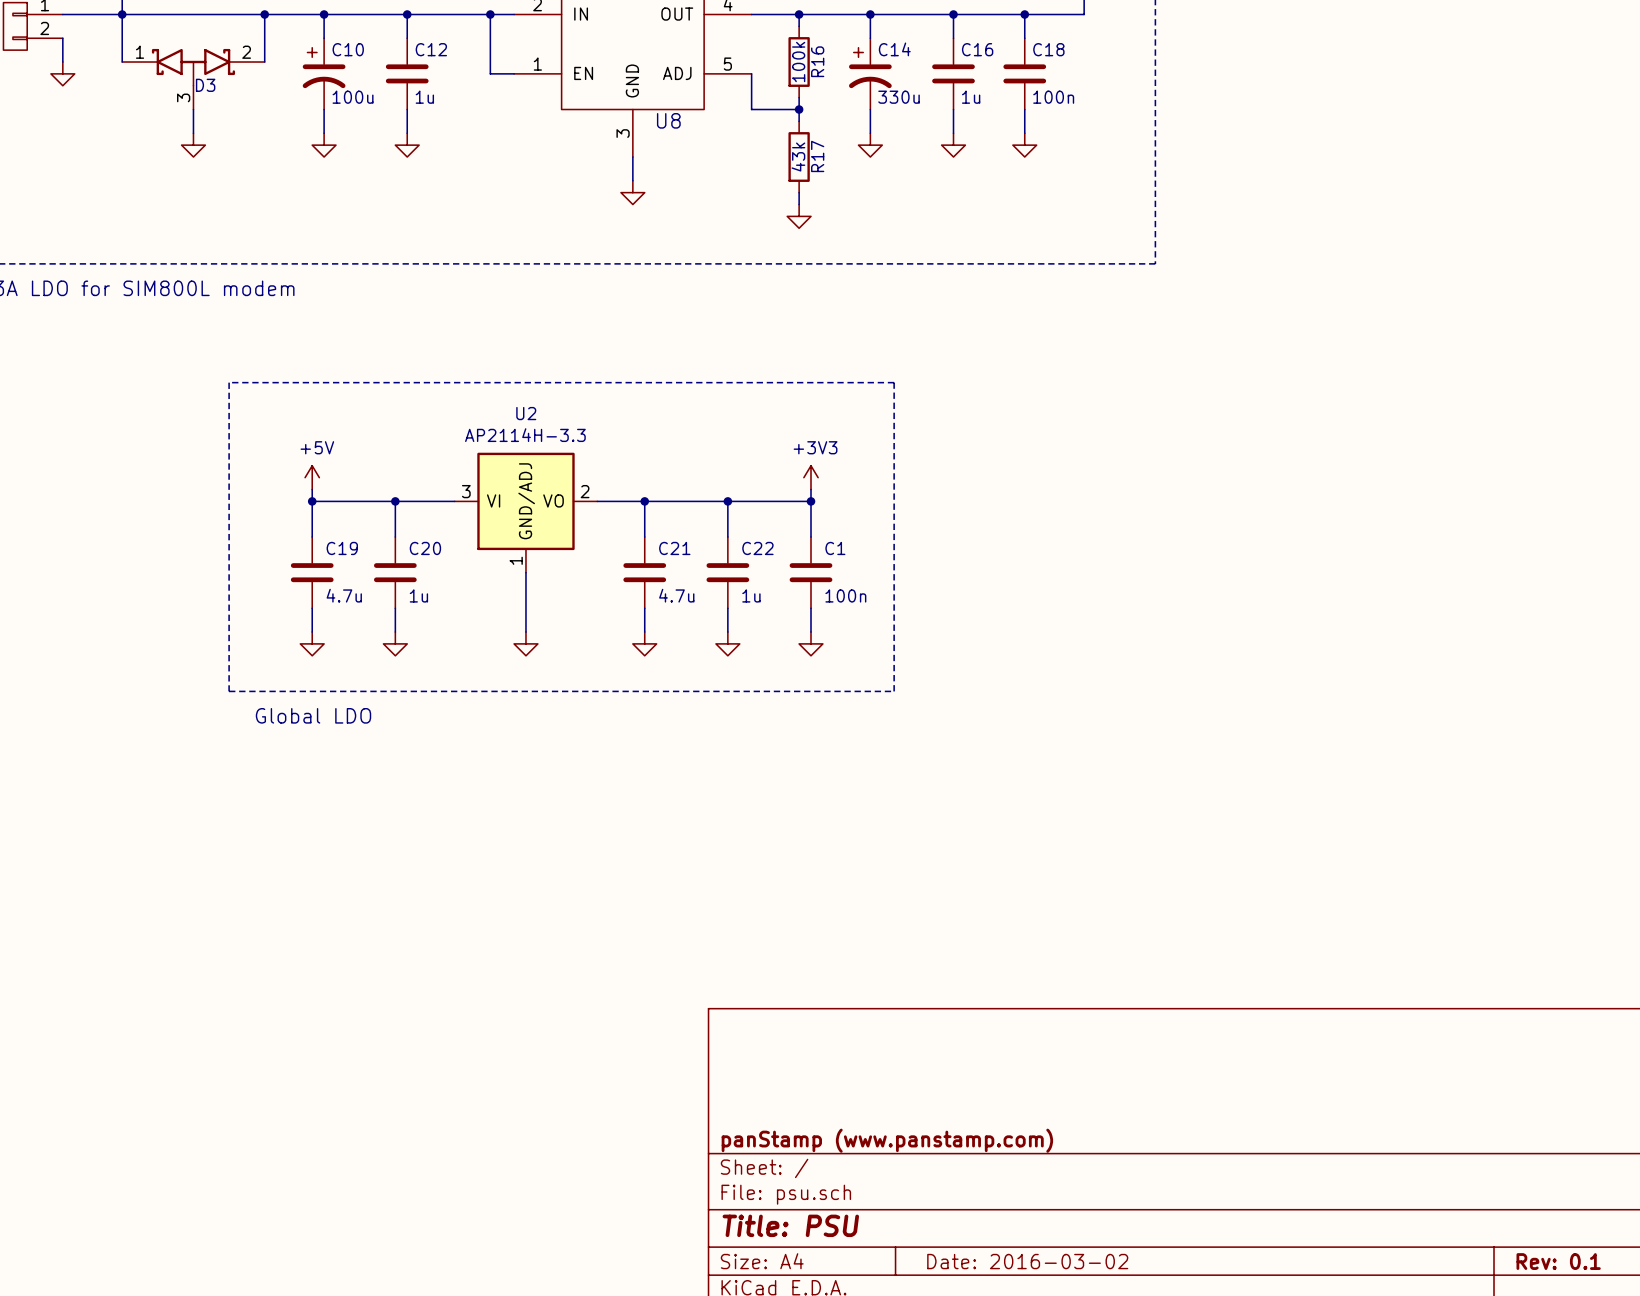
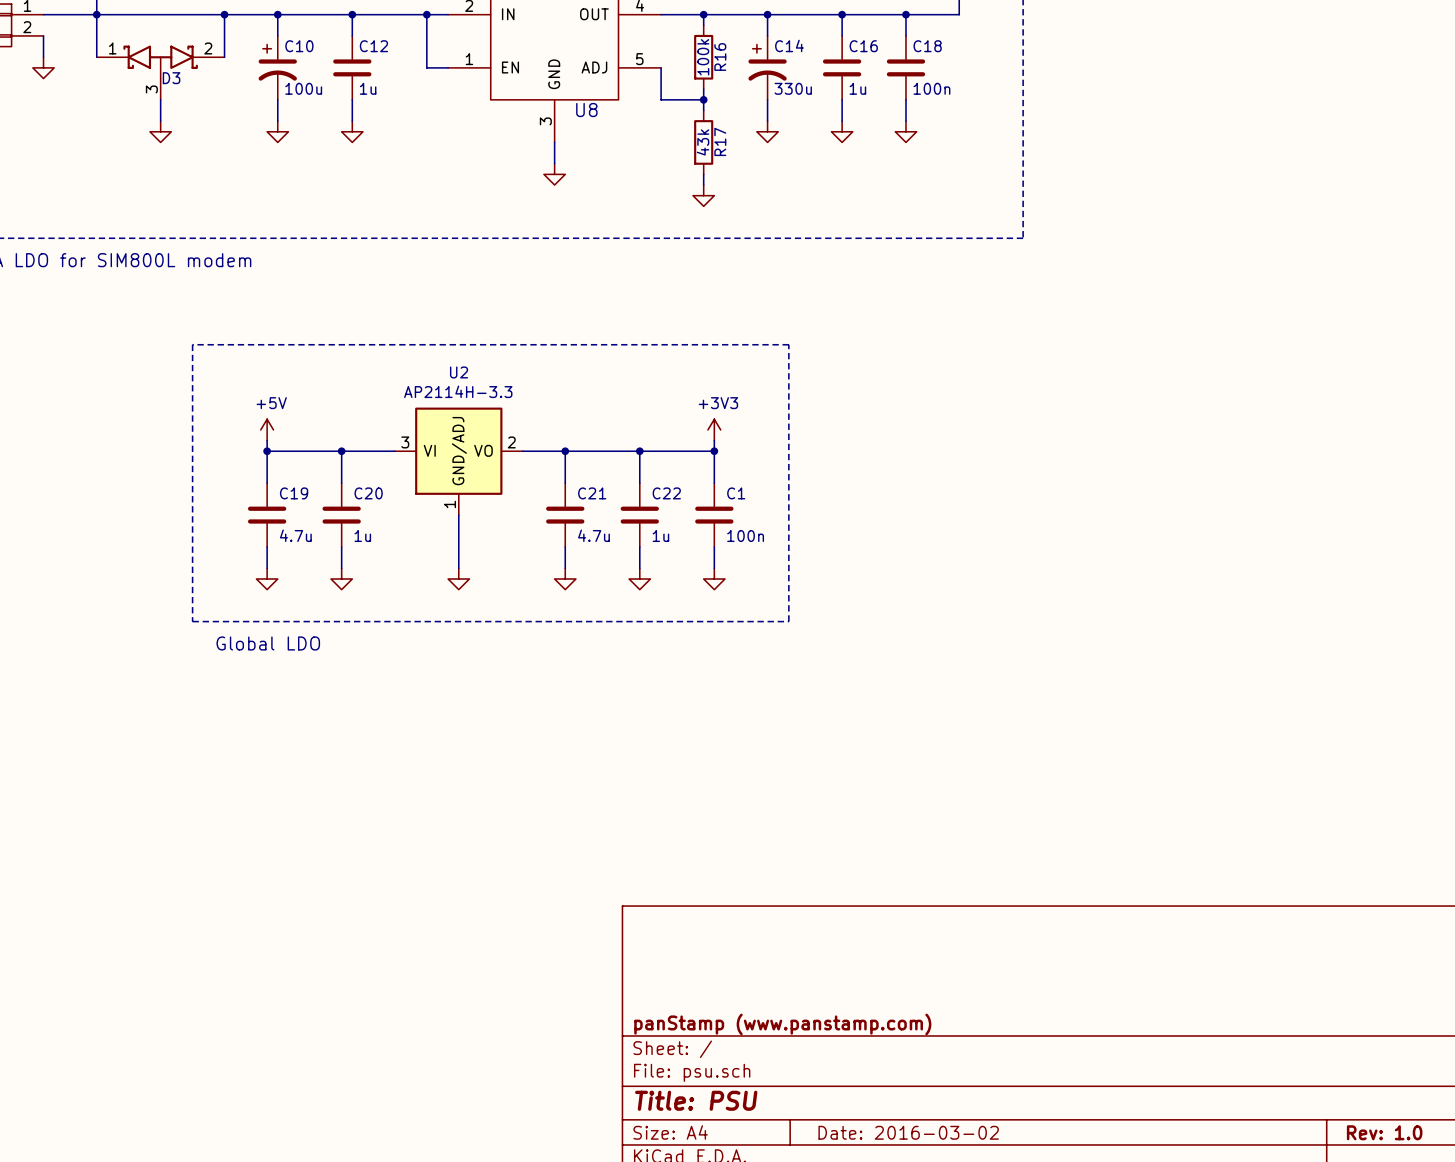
title block: Rev: 0.1 (1558, 1261) -> Rev: 1.0 (1384, 1132)

